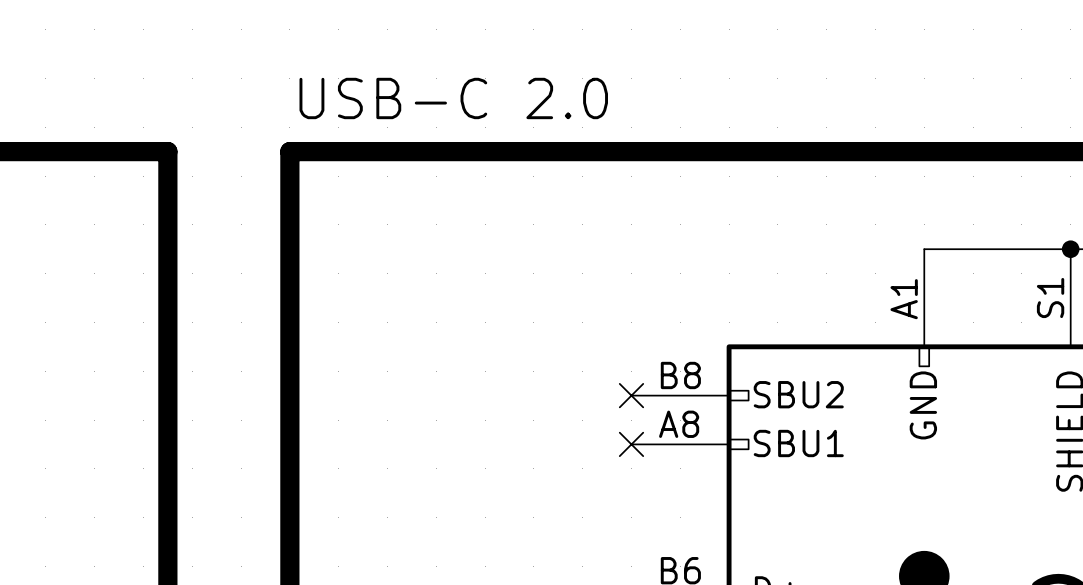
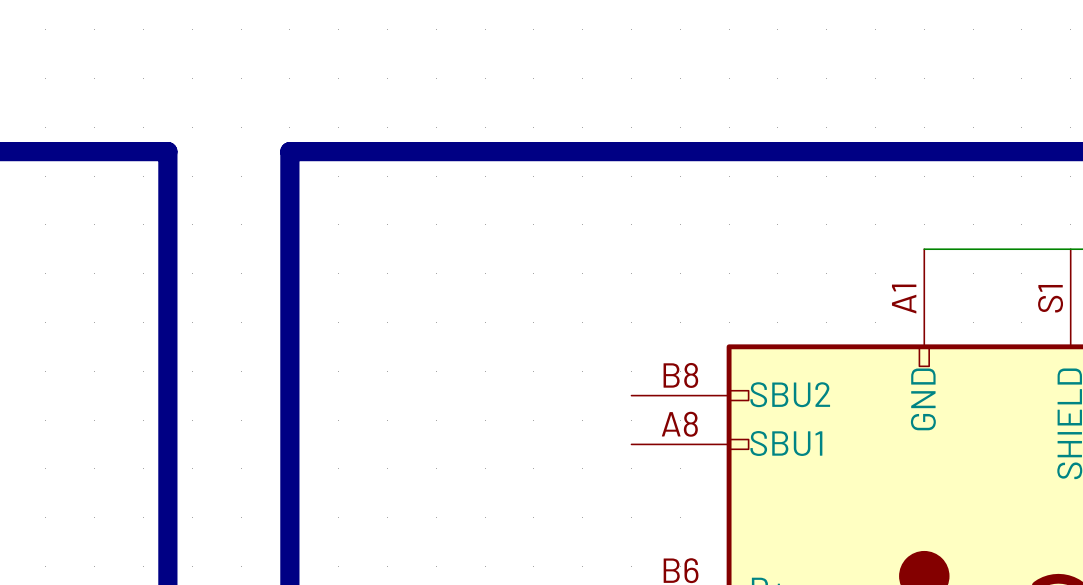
text: USB-C 2.0 (453, 98) -> none
junction: (1070, 249) -> none
no-connect mark: (631, 395) -> none
no-connect mark: (631, 444) -> none

